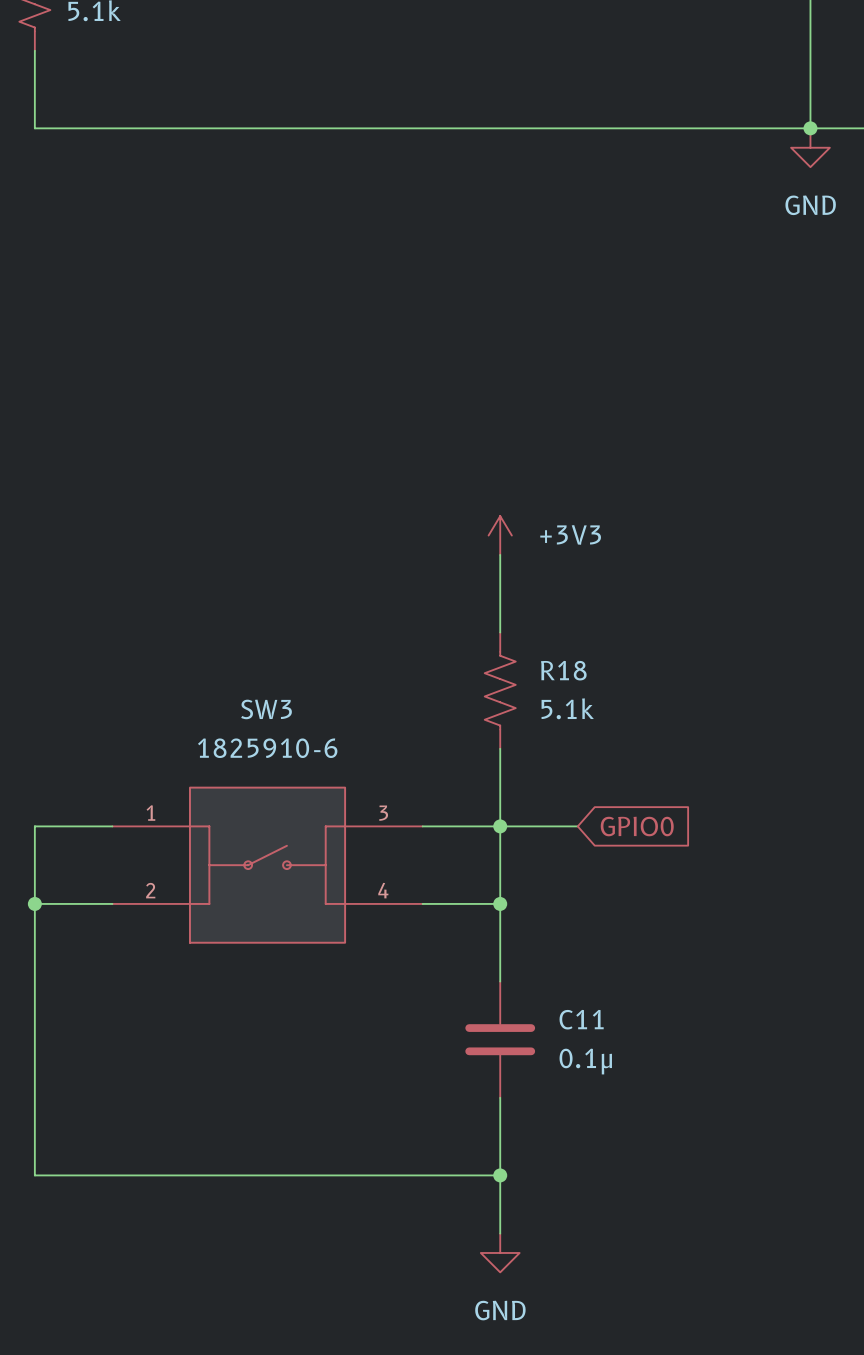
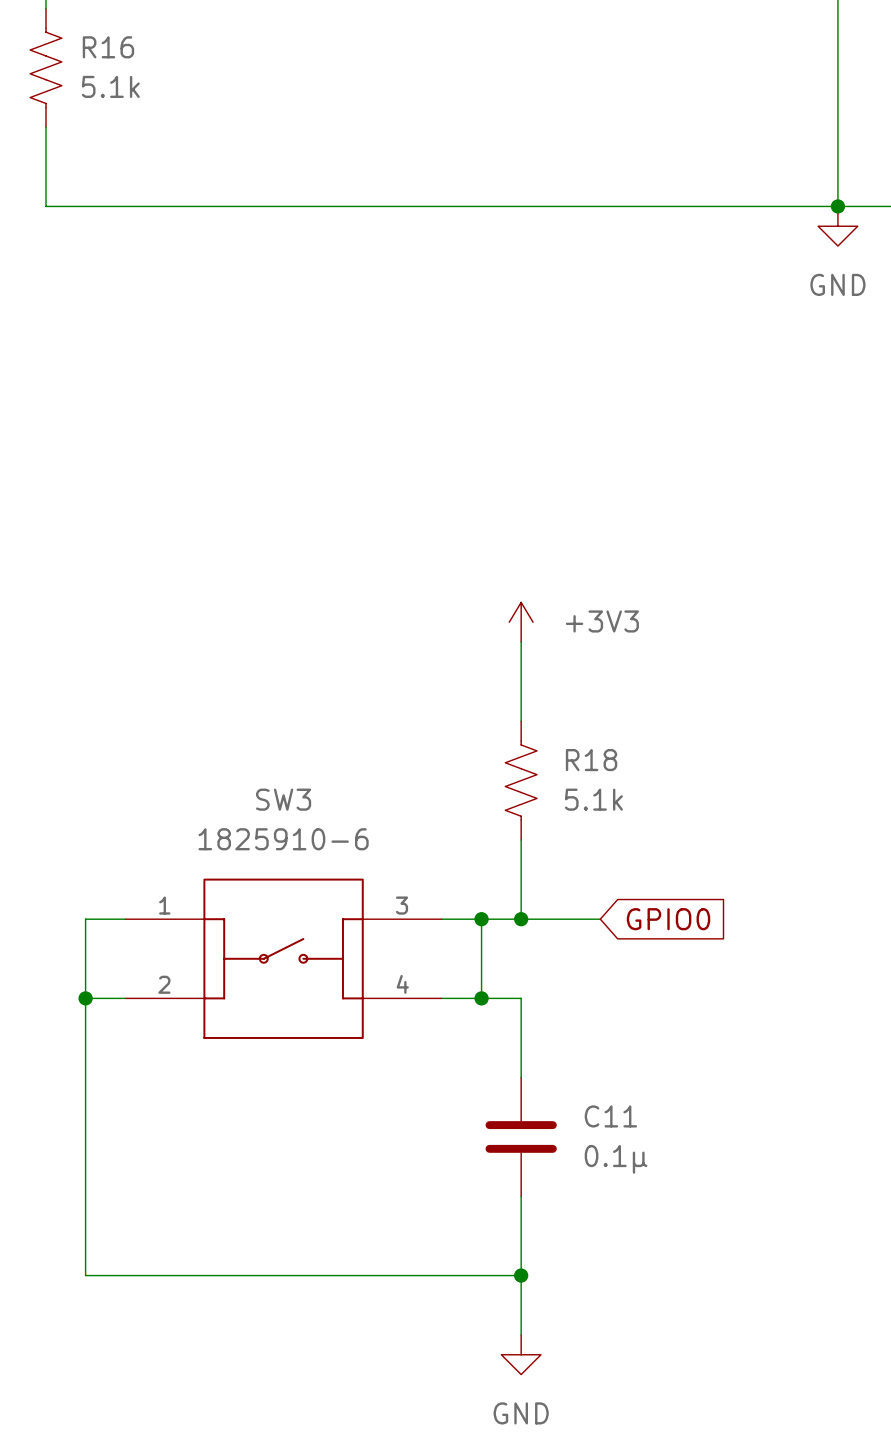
wire: (73, 826) (34, 826) (34, 1175) (73, 1175) -> (85, 919) (85, 1275)
junction: none -> (481, 919)
wire: (500, 826) (500, 903) -> (481, 919) (481, 998)
wire: (34, 903) (73, 903) -> none
junction position: (34, 903) -> (85, 998)
junction position: (500, 903) -> (481, 998)

